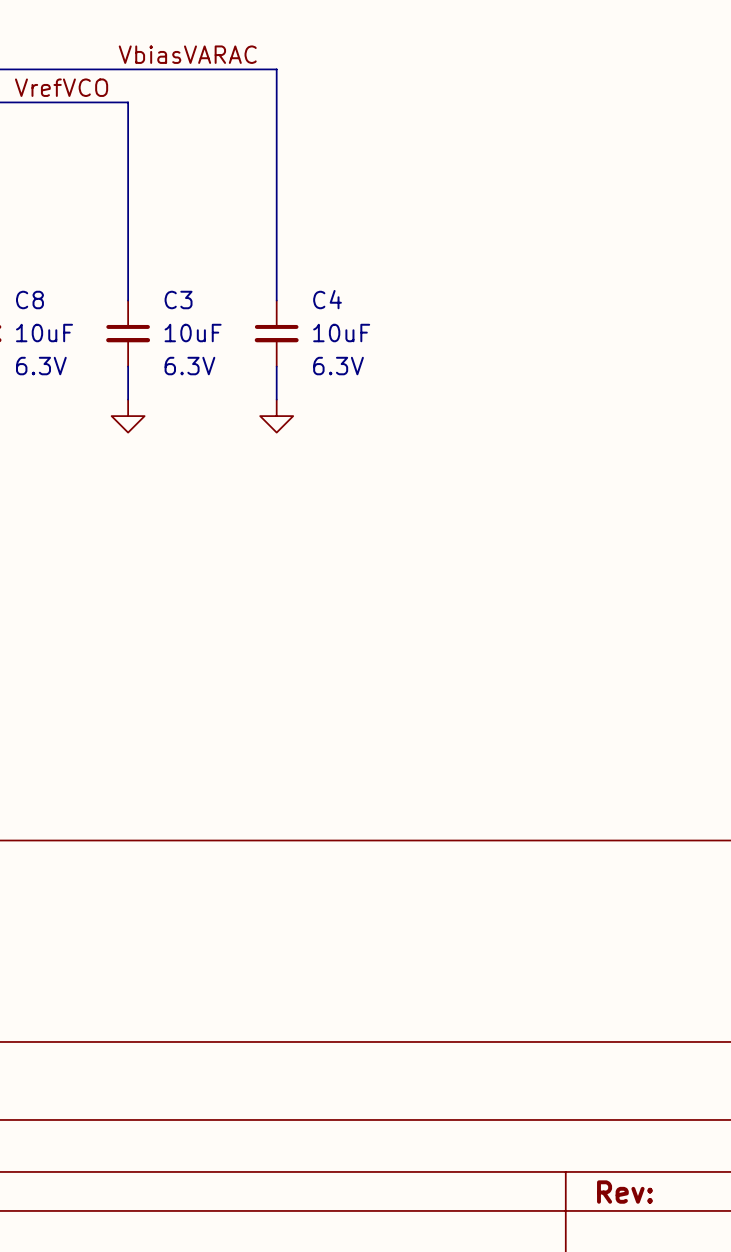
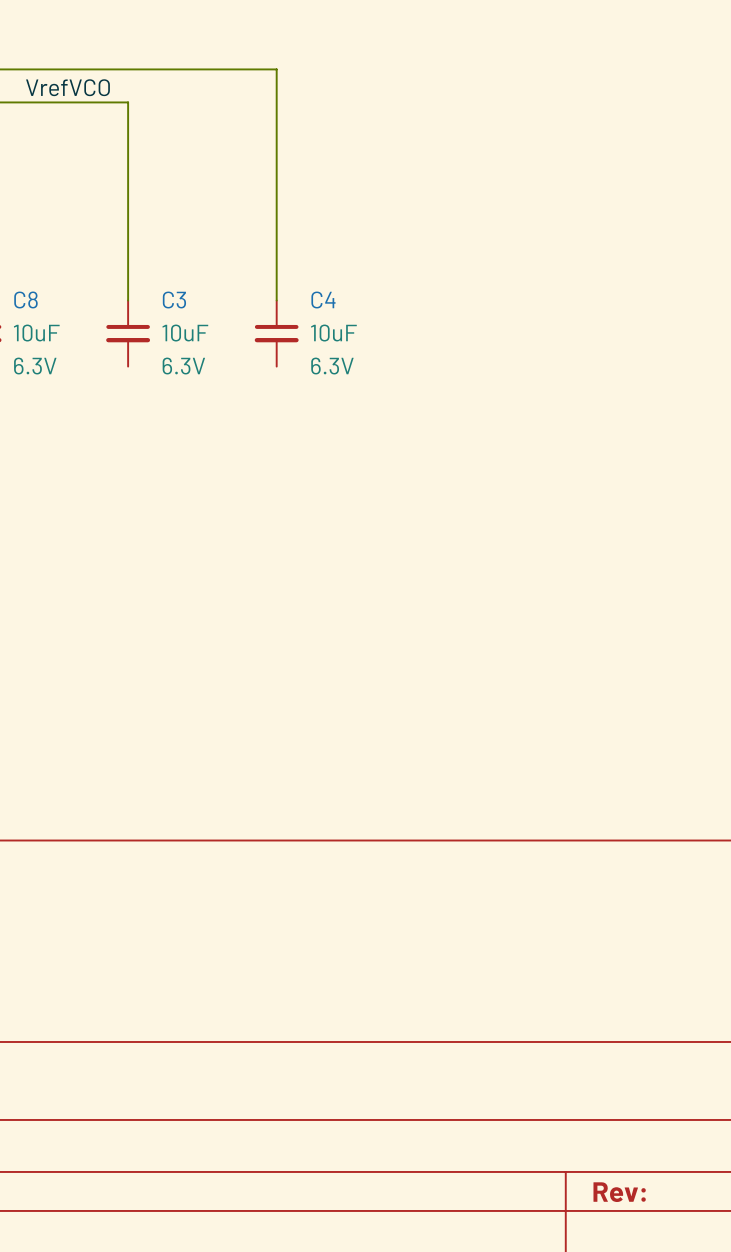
label: VbiasVARAC (187, 54) -> none
wire: (128, 366) (128, 399) -> none
wire: (276, 366) (276, 399) -> none
power symbol: (128, 416) -> none
power symbol: (276, 416) -> none

